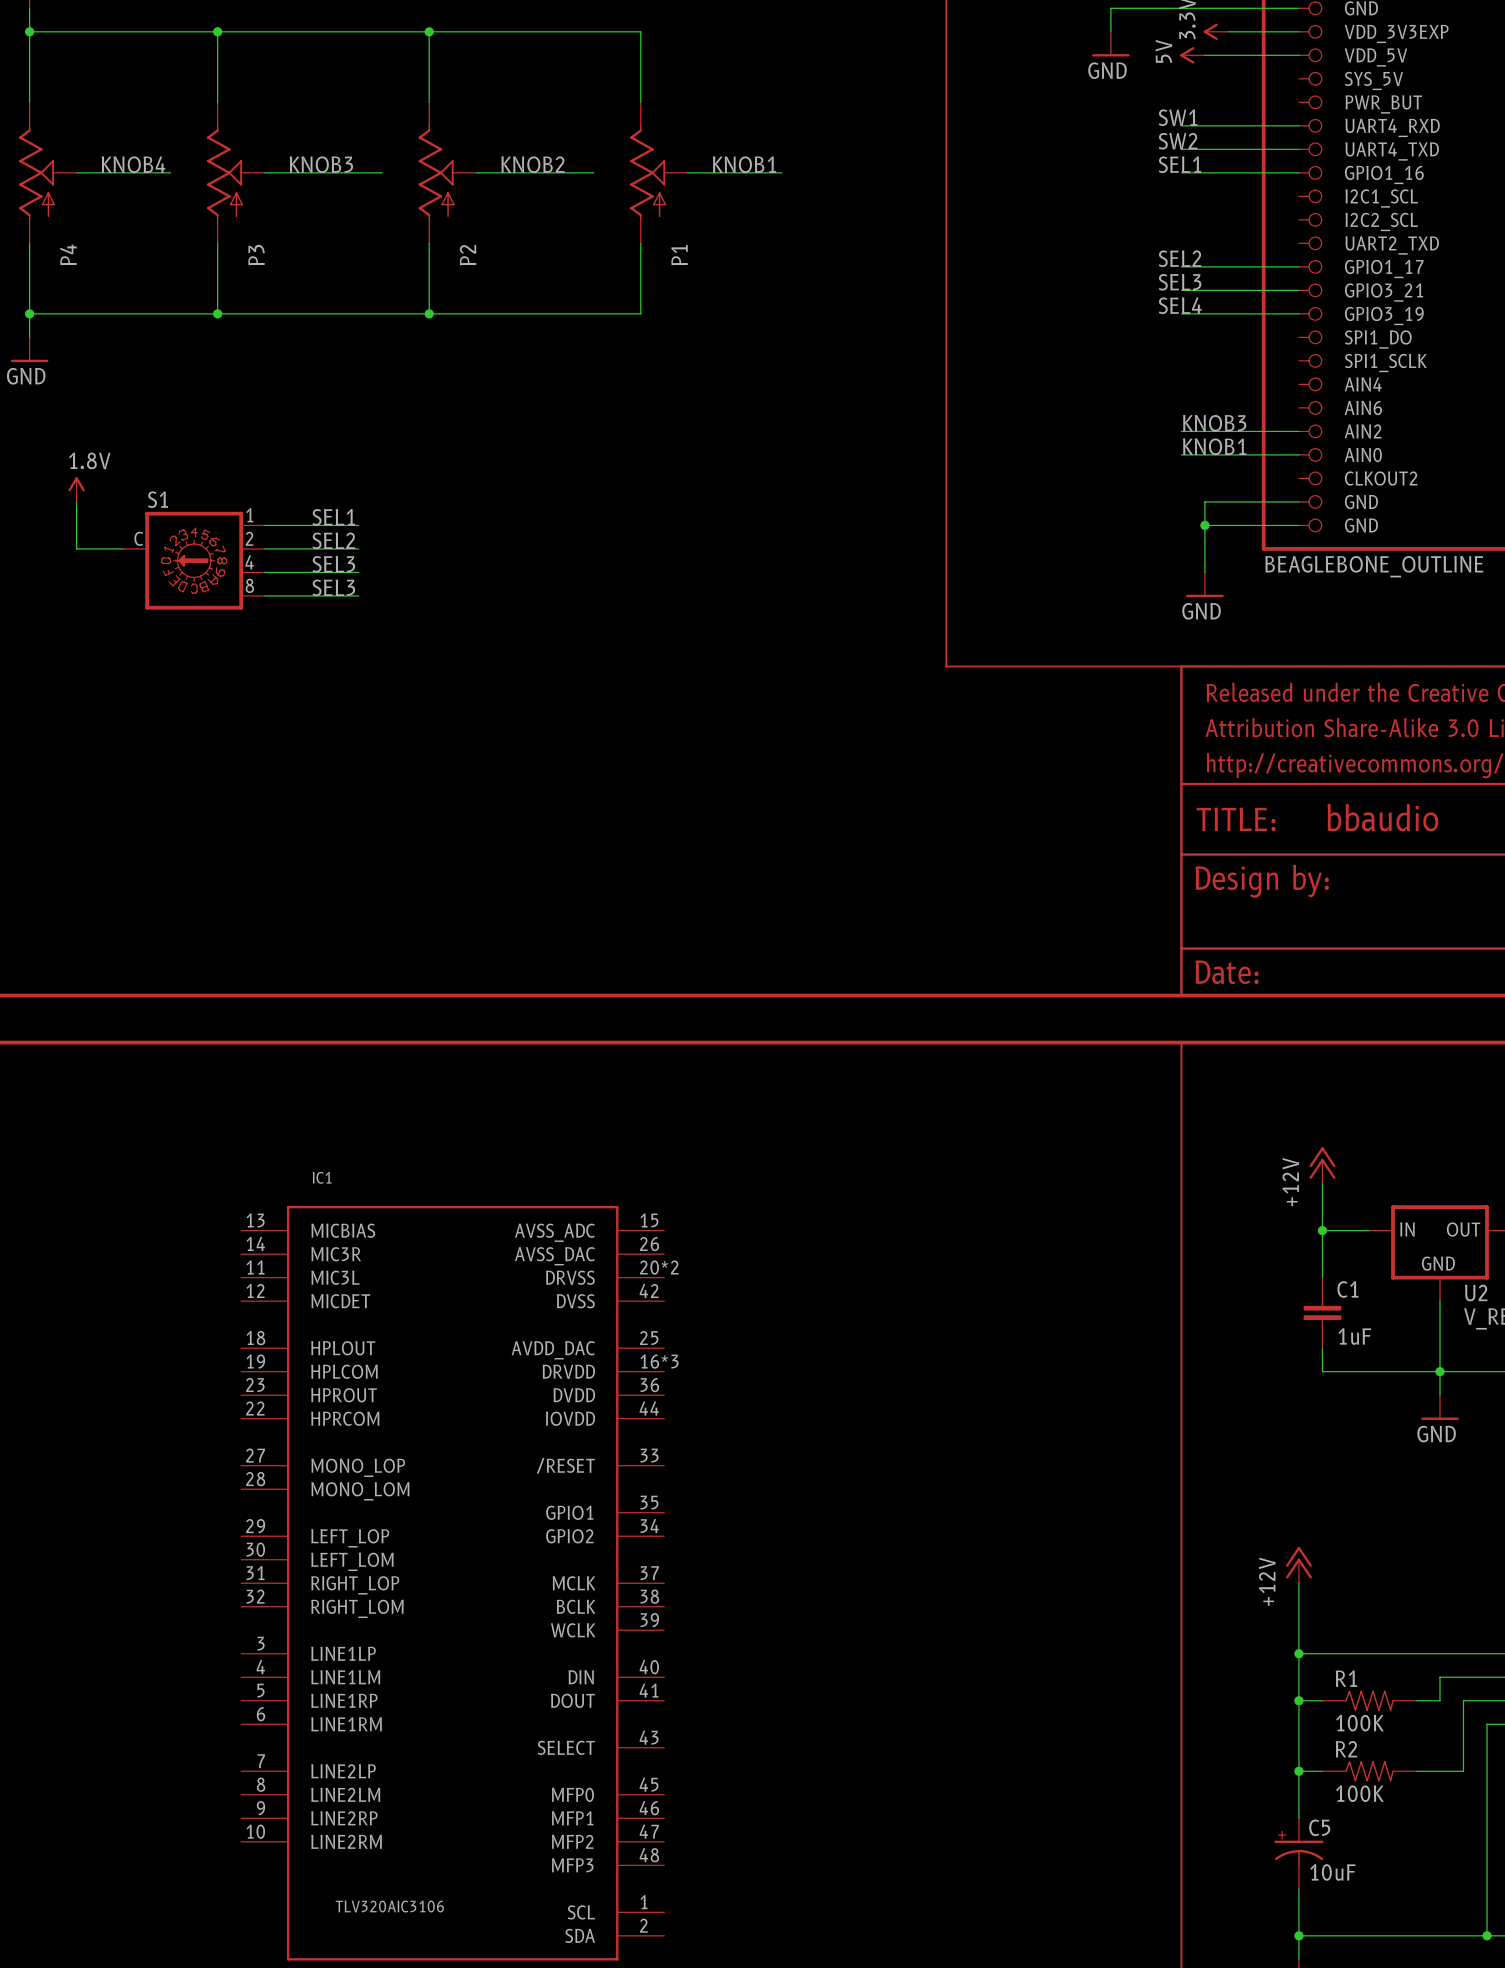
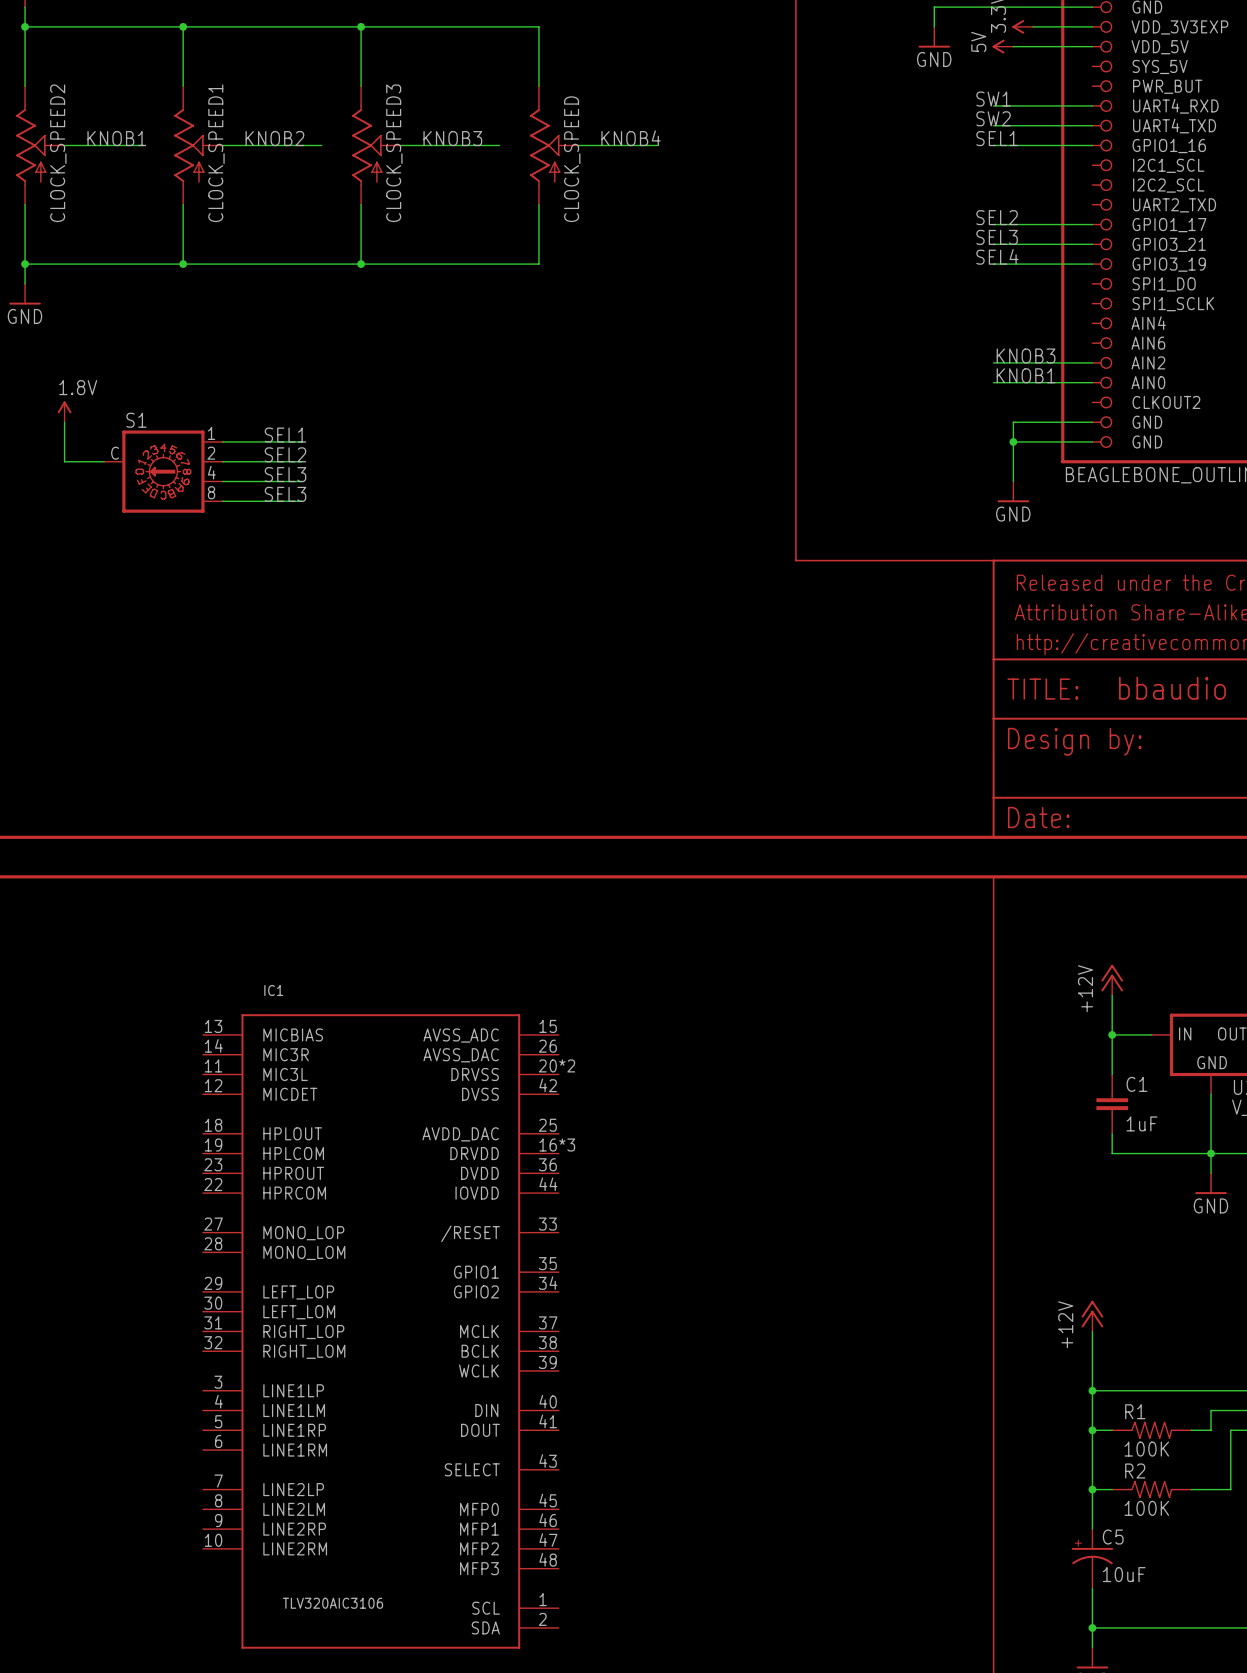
label: KNOB4 (133, 164) -> KNOB1 (116, 138)
label: KNOB3 (321, 164) -> KNOB2 (274, 138)
label: KNOB2 (532, 164) -> KNOB3 (452, 138)
label: KNOB1 (744, 164) -> KNOB4 (631, 138)
P4 name: P4 (68, 254) -> CLOCK_SPEED2 (58, 153)
P3 name: P3 (256, 255) -> CLOCK_SPEED1 (216, 153)
P2 name: P2 (468, 255) -> CLOCK_SPEED3 (394, 153)
P1 name: P1 (679, 255) -> CLOCK_SPEED (572, 159)

